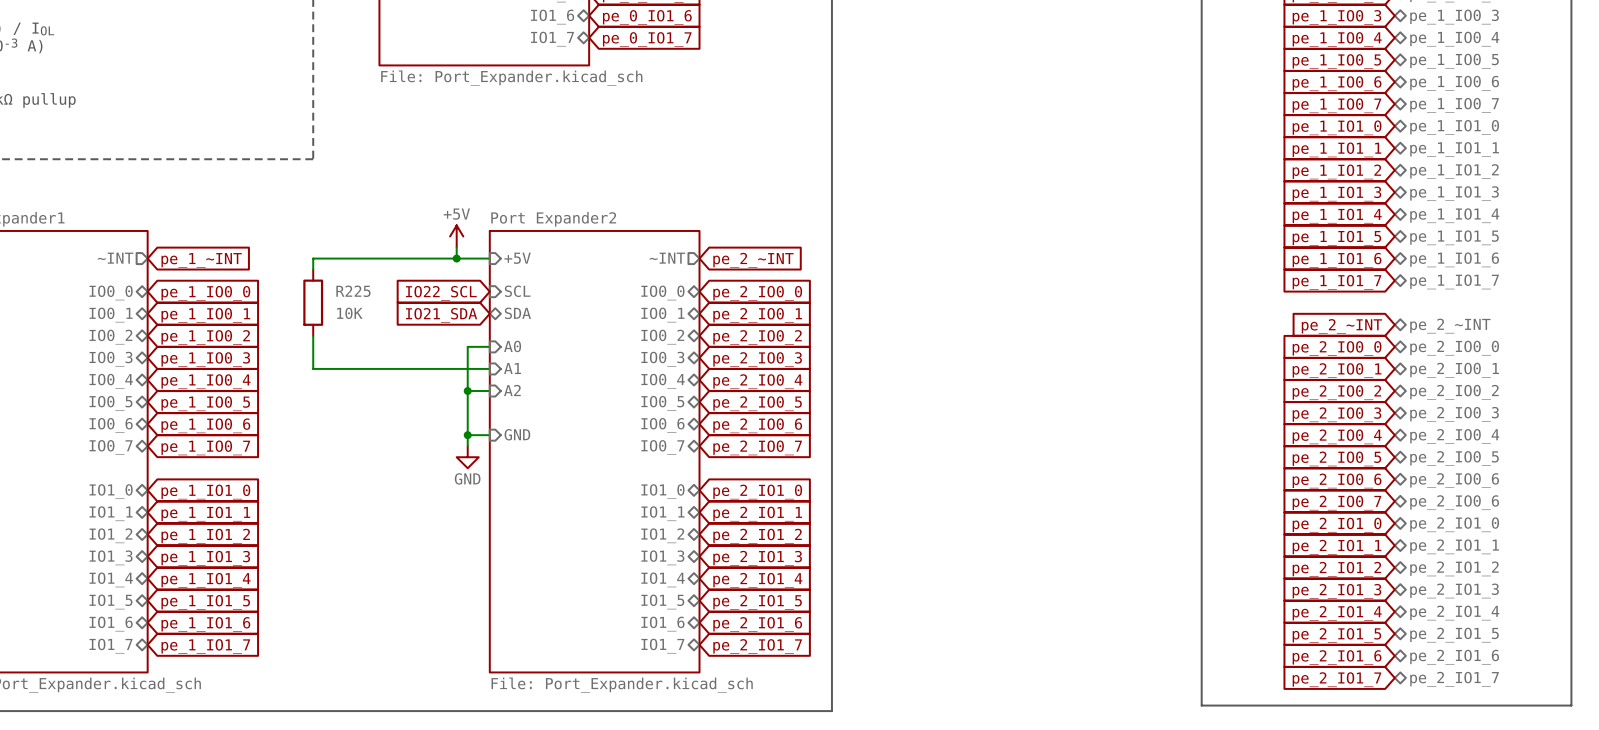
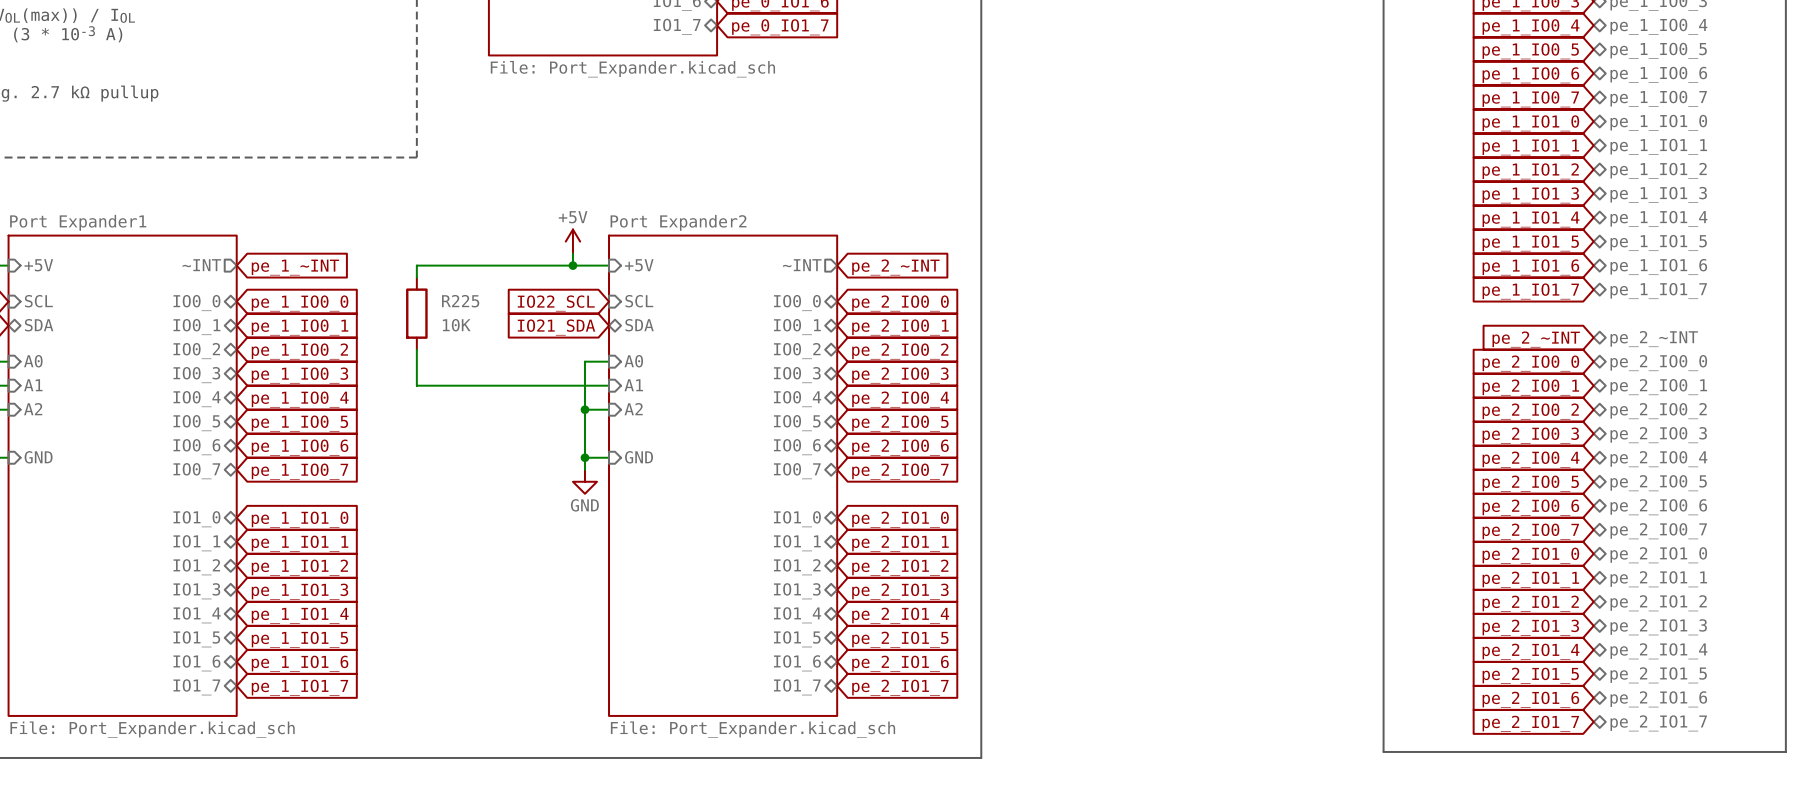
hierarchical label: pe_2_IO0_6 (1454, 502) -> pe_2_IO0_7 (1658, 531)

